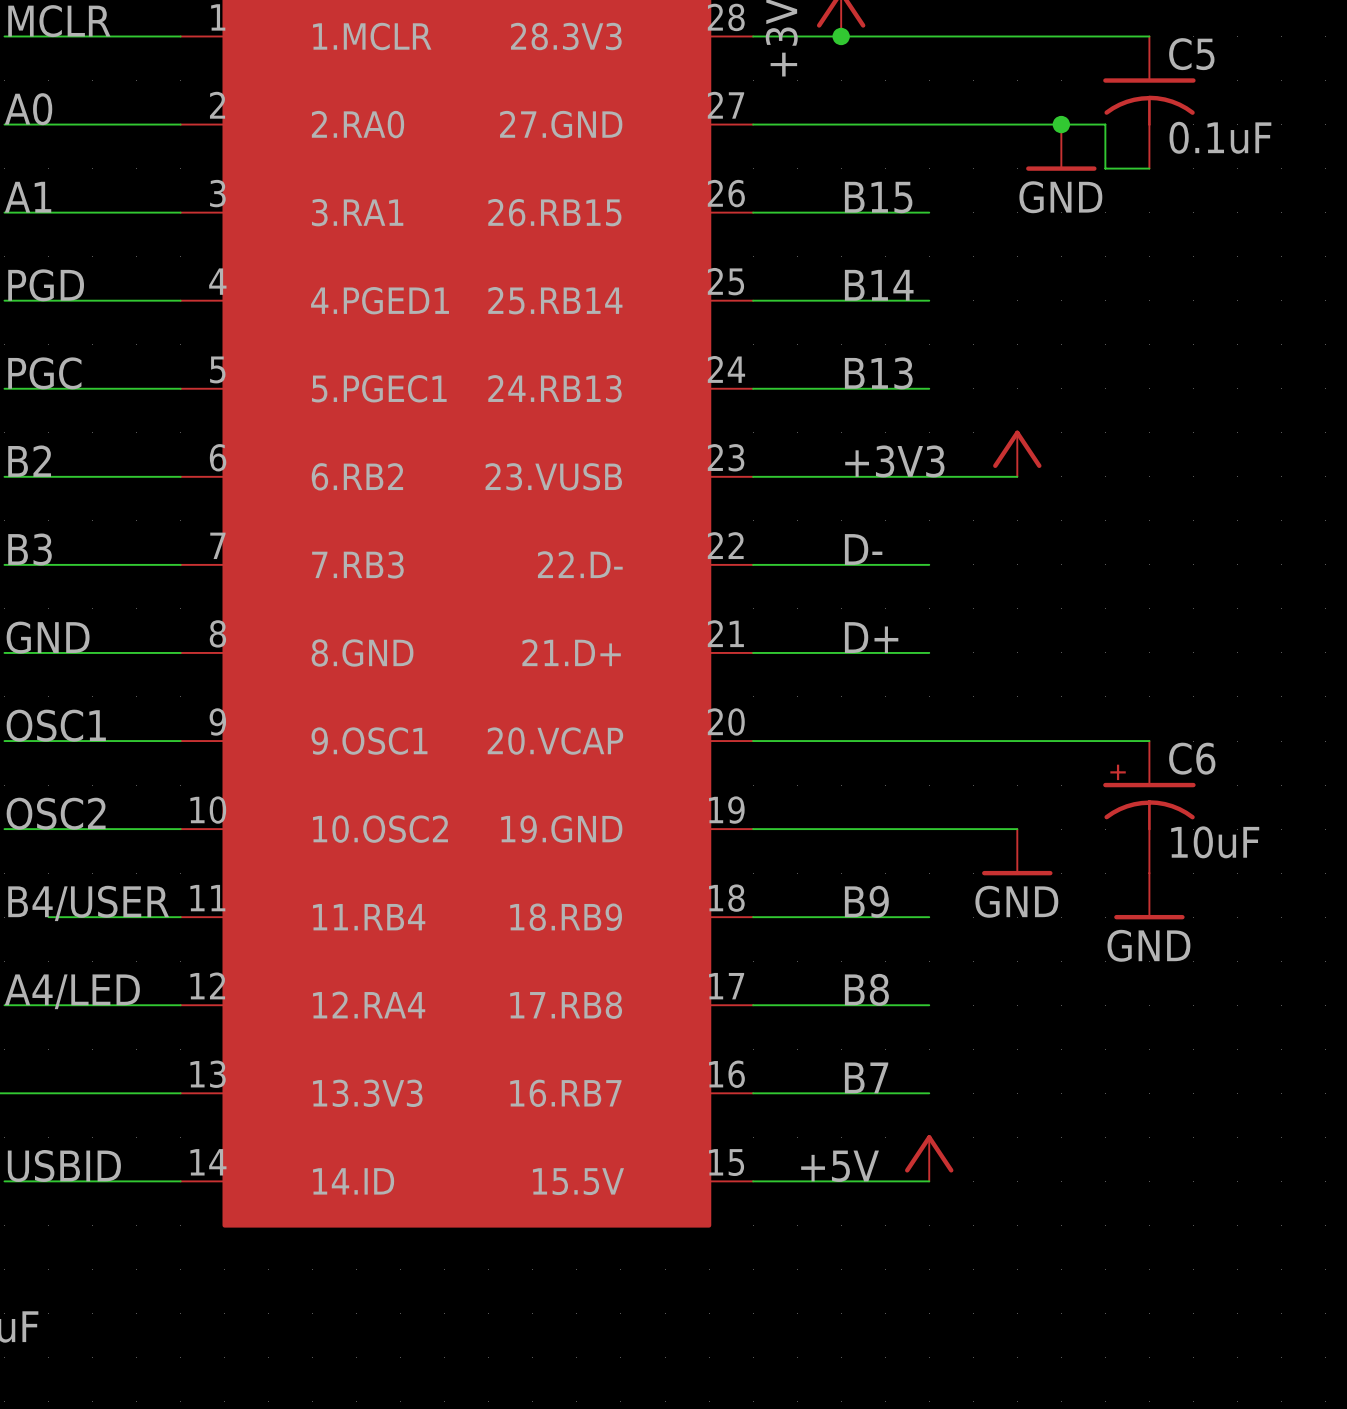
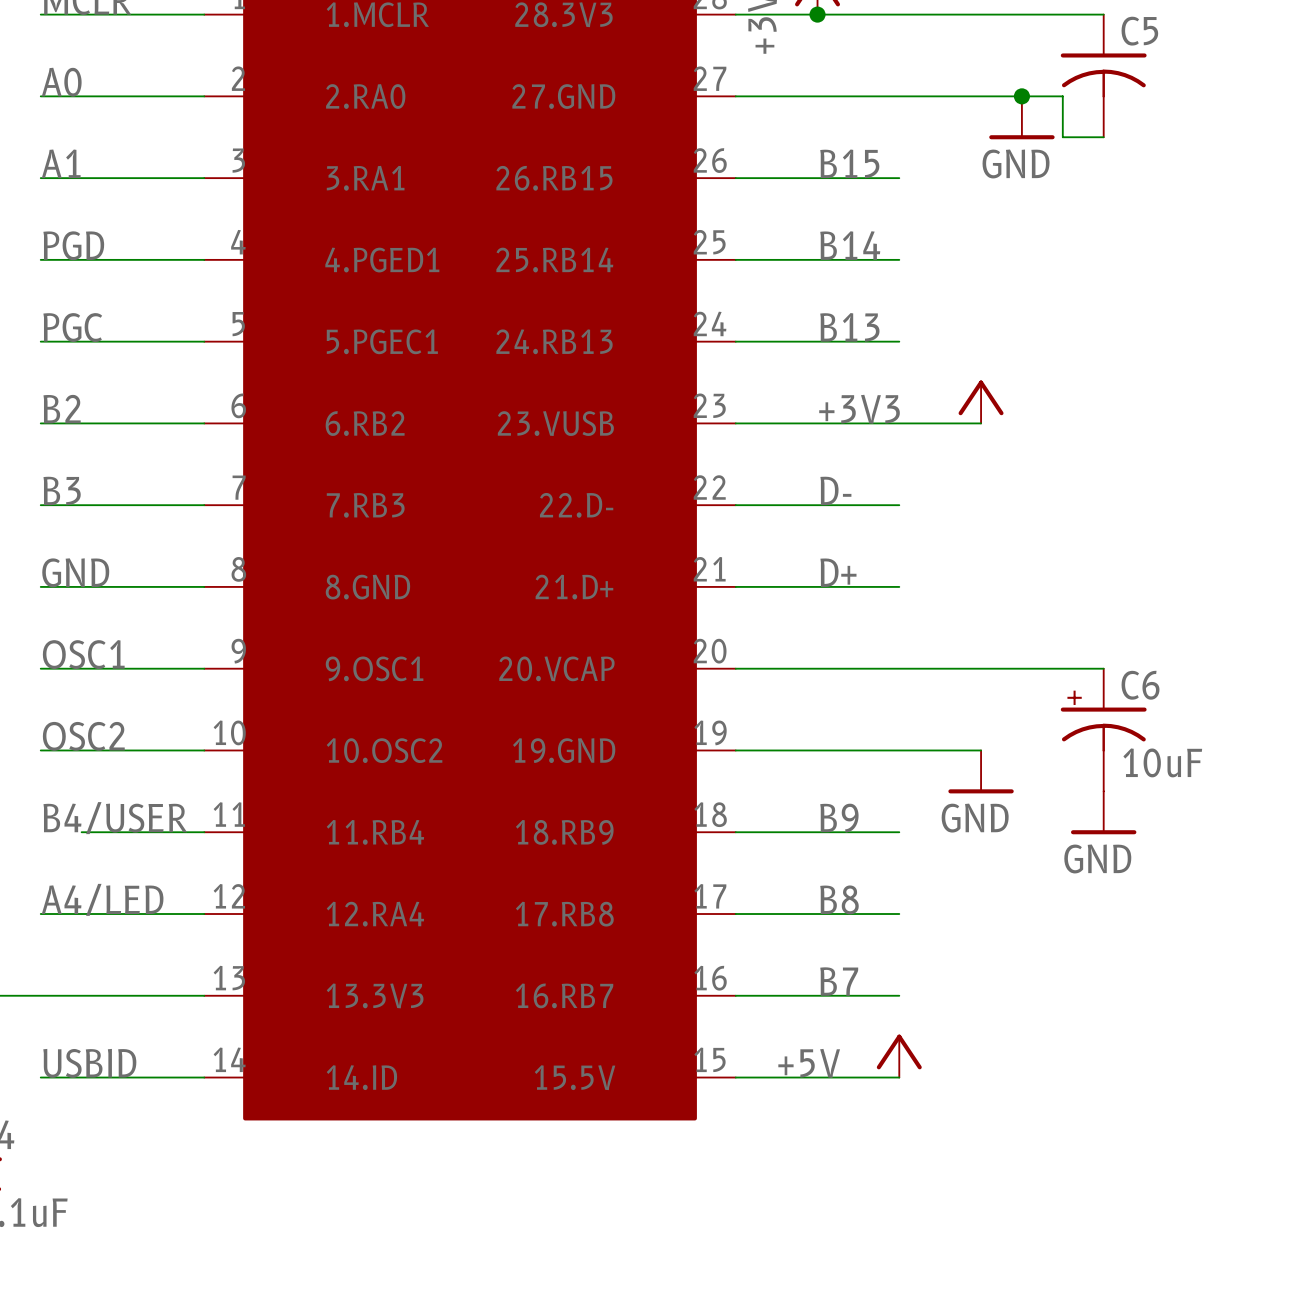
C5 value: 0.1uF (1220, 137) -> none

